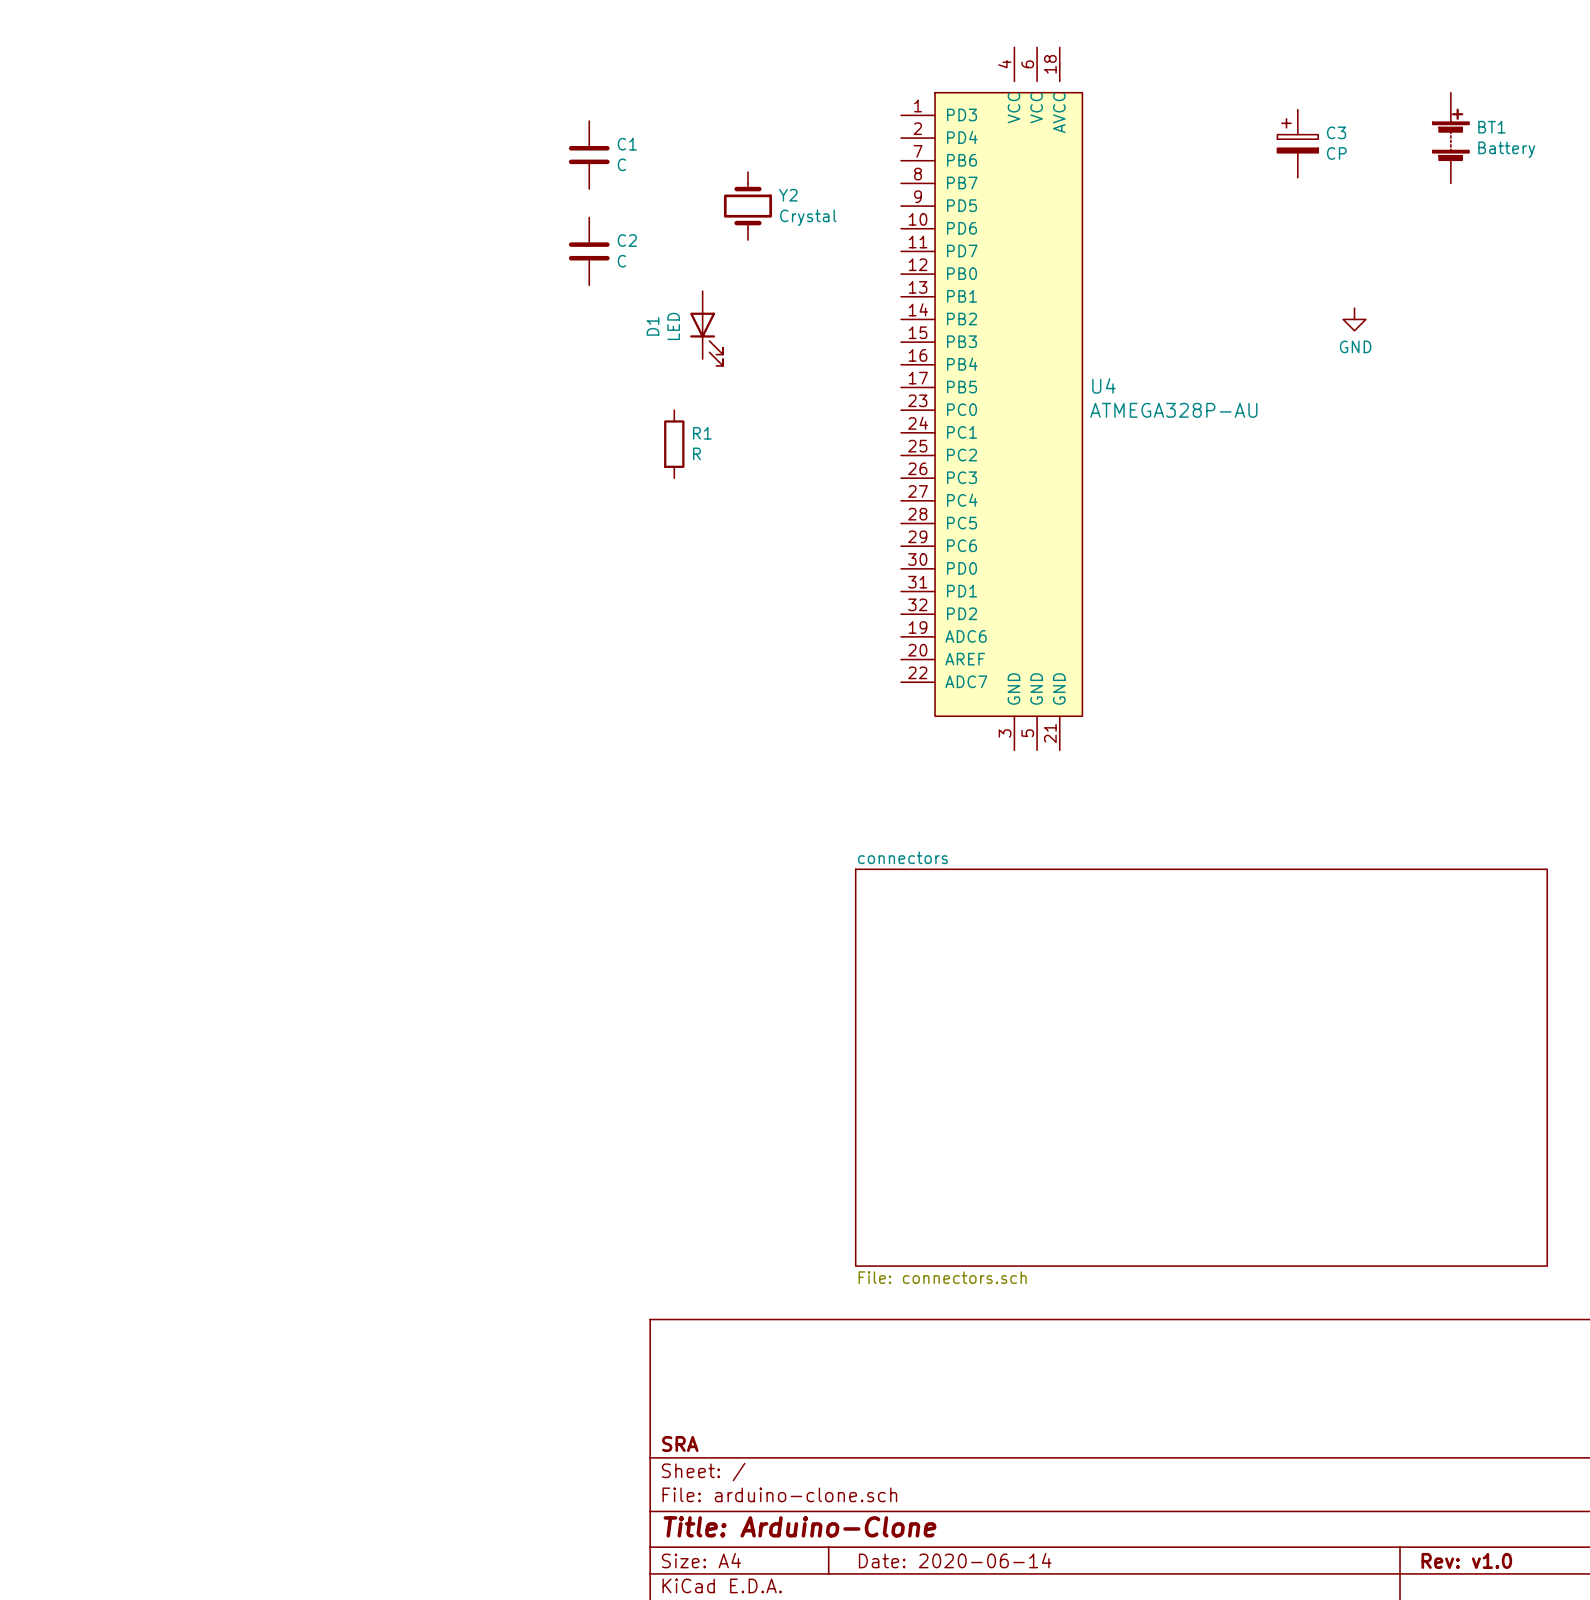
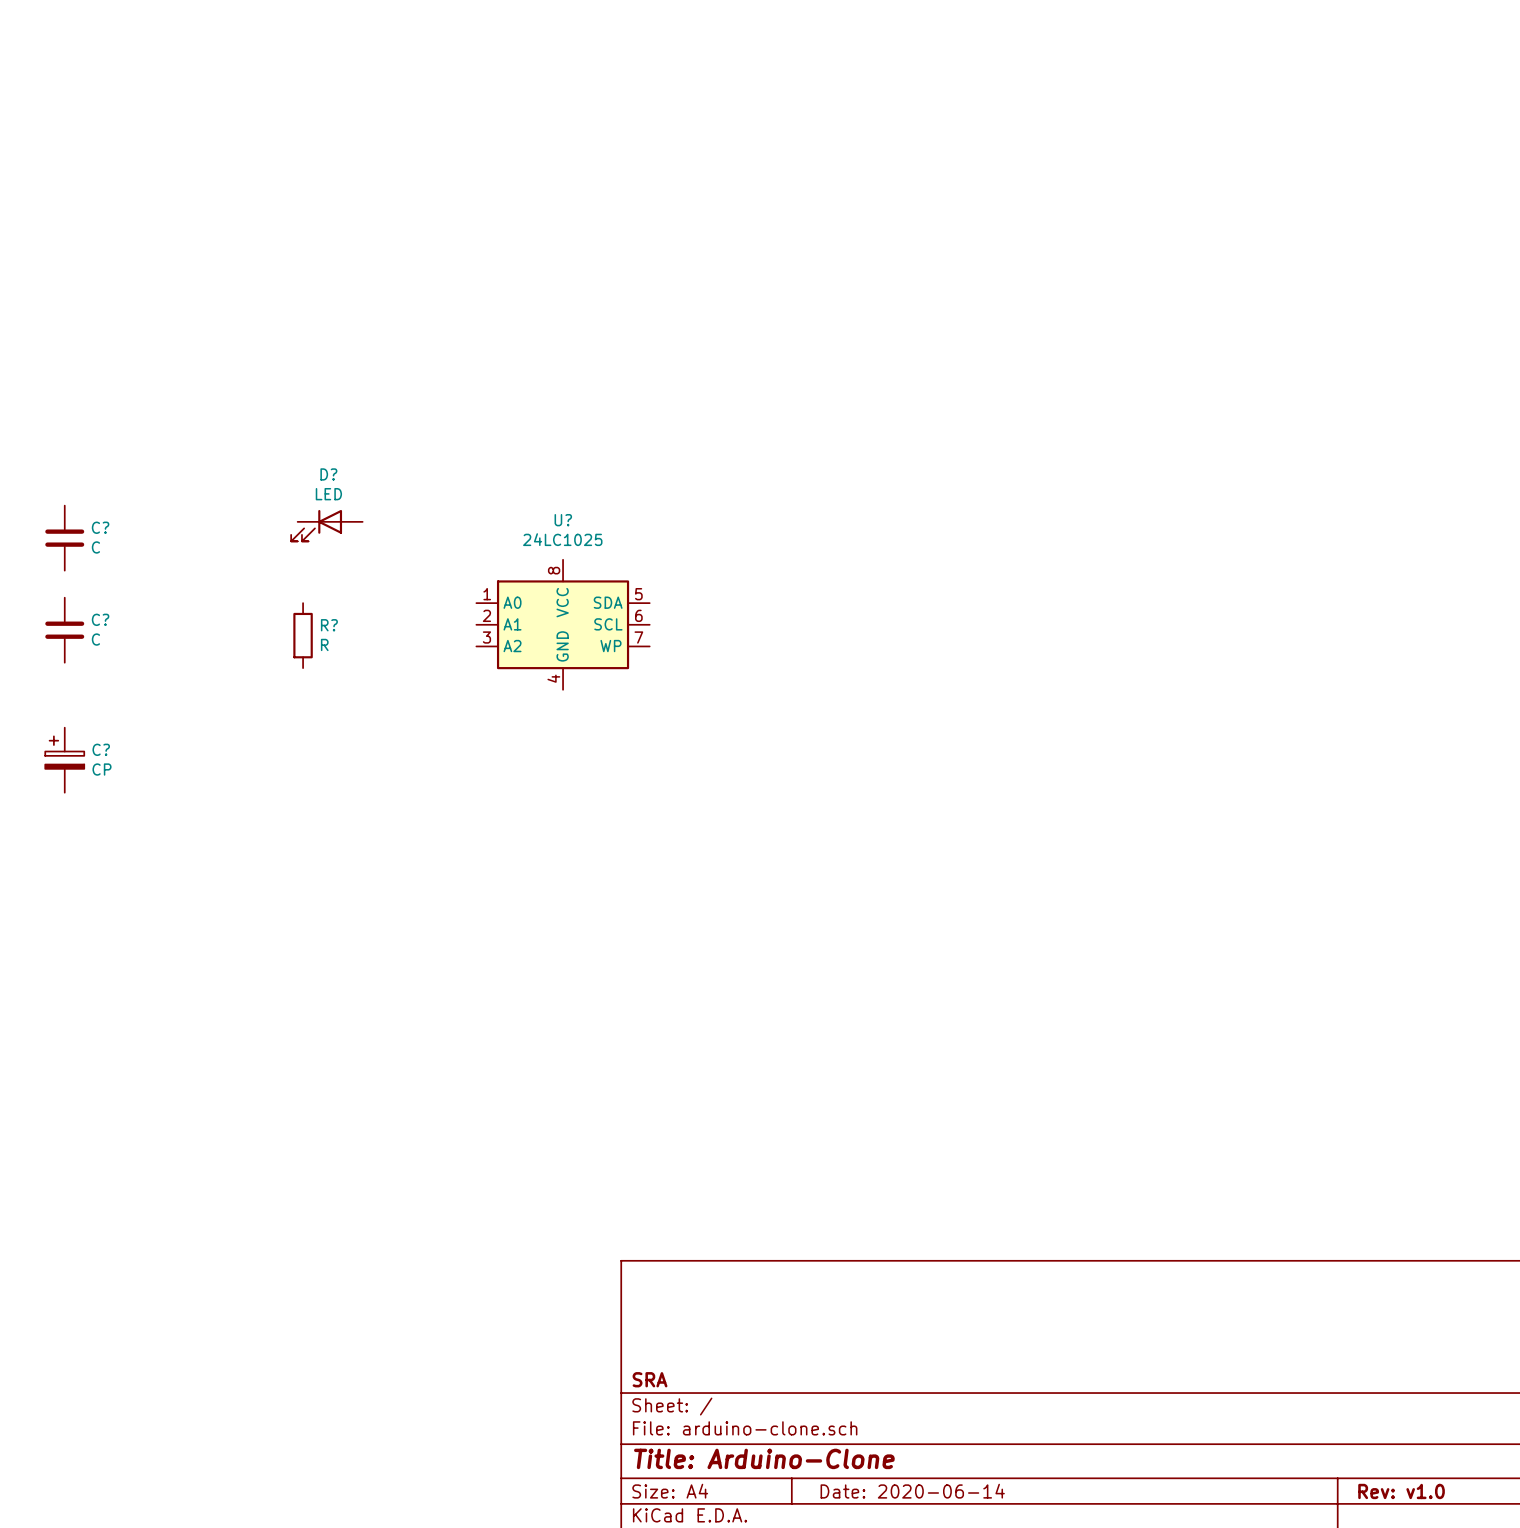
BT1: Battery (1450, 138) -> none
C3: CP (1297, 143) -> none
C1: C (589, 155) -> none
Y2: Crystal (747, 206) -> none
C2: C (589, 251) -> none
power symbol: GND (1354, 319) -> none
D1: LED (706, 328) -> none
U4: ATMEGA328P-AU (991, 398) -> none
R1: R (674, 444) -> none
D?: none -> LED (326, 525)
C?: none -> C (64, 538)
U?: none -> 24LC1025 (563, 624)
C?: none -> C (64, 630)
R?: none -> R (303, 635)
C?: none -> CP (64, 760)
sheet connectors: File: connectors.sch (1201, 1067) -> none

